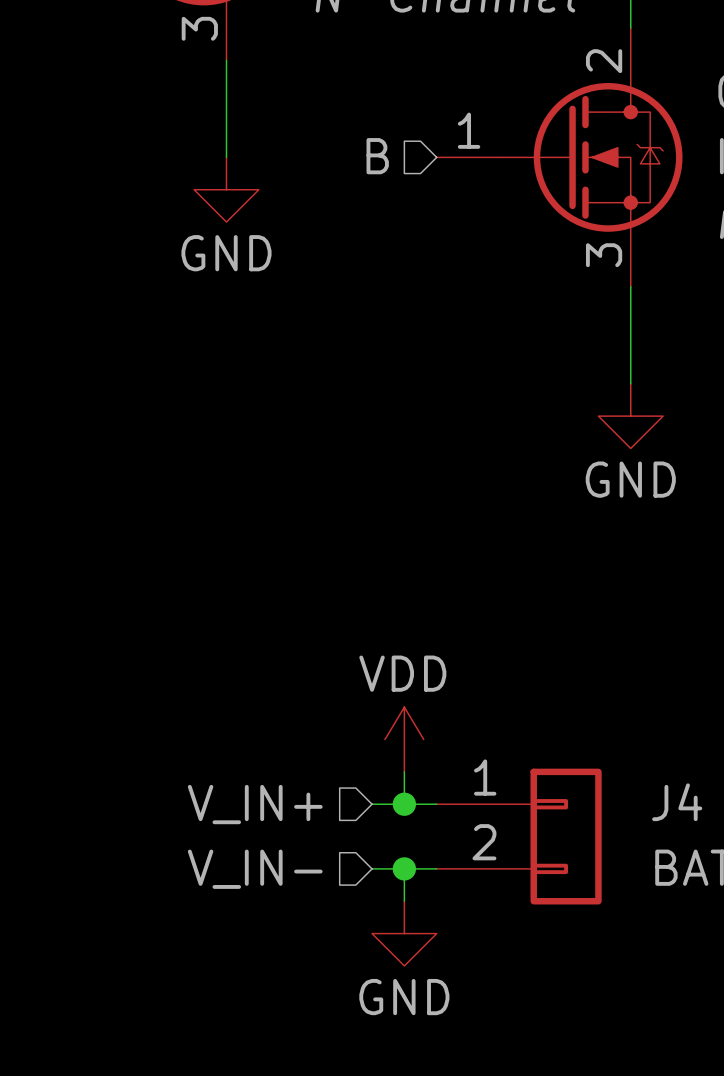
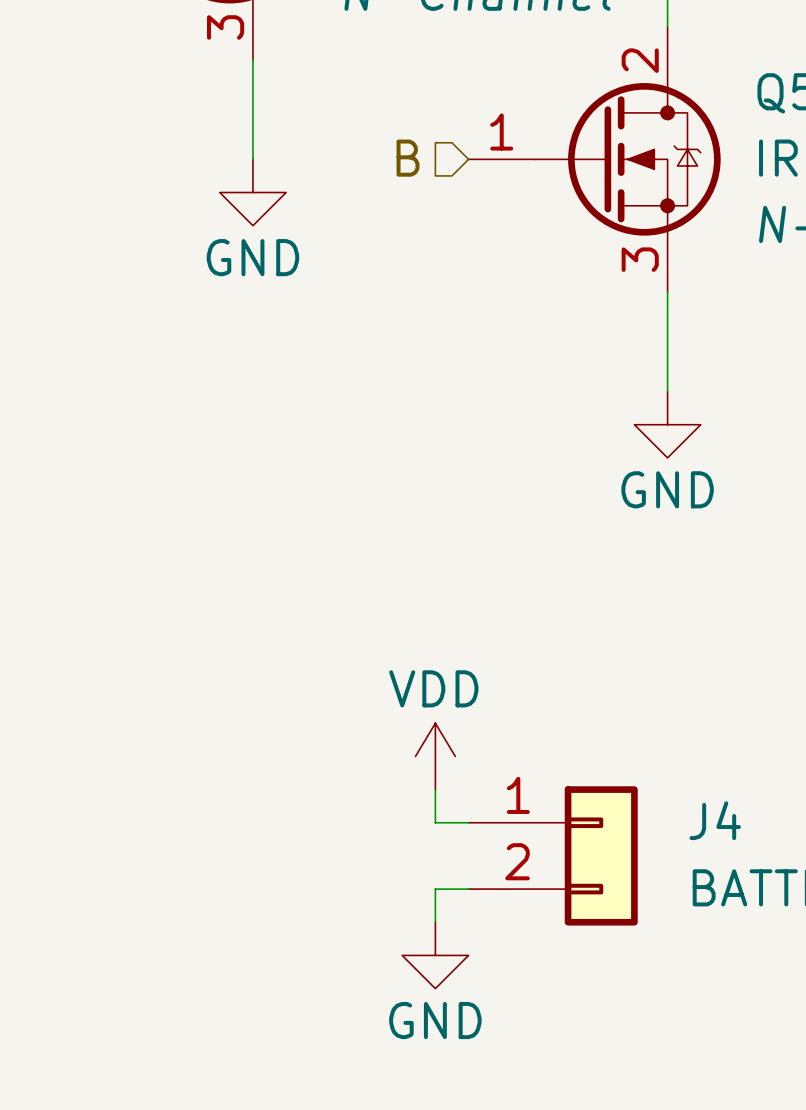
hierarchical label: V_IN+ (255, 804) -> none
wire: (372, 804) (404, 804) -> none
junction: (404, 804) -> none
wire: (372, 868) (404, 868) -> none
junction: (404, 868) -> none
hierarchical label: V_IN- (255, 869) -> none

